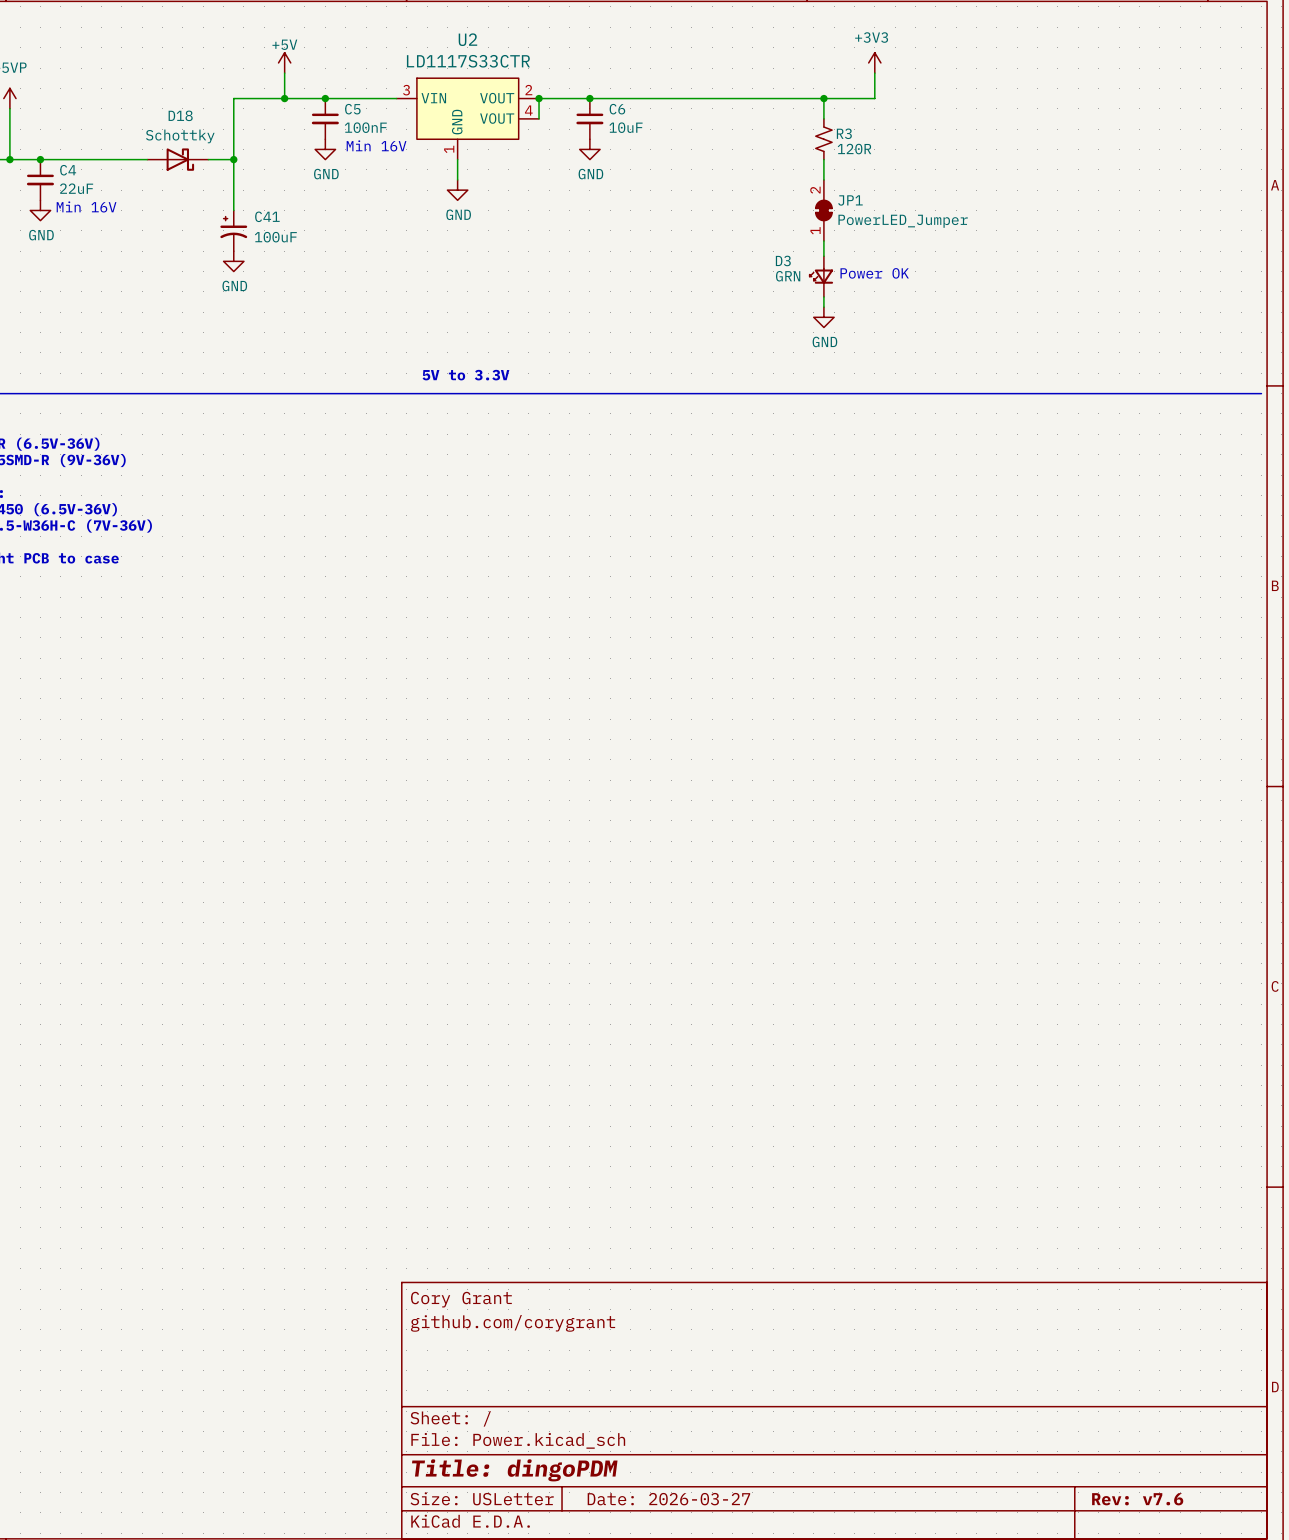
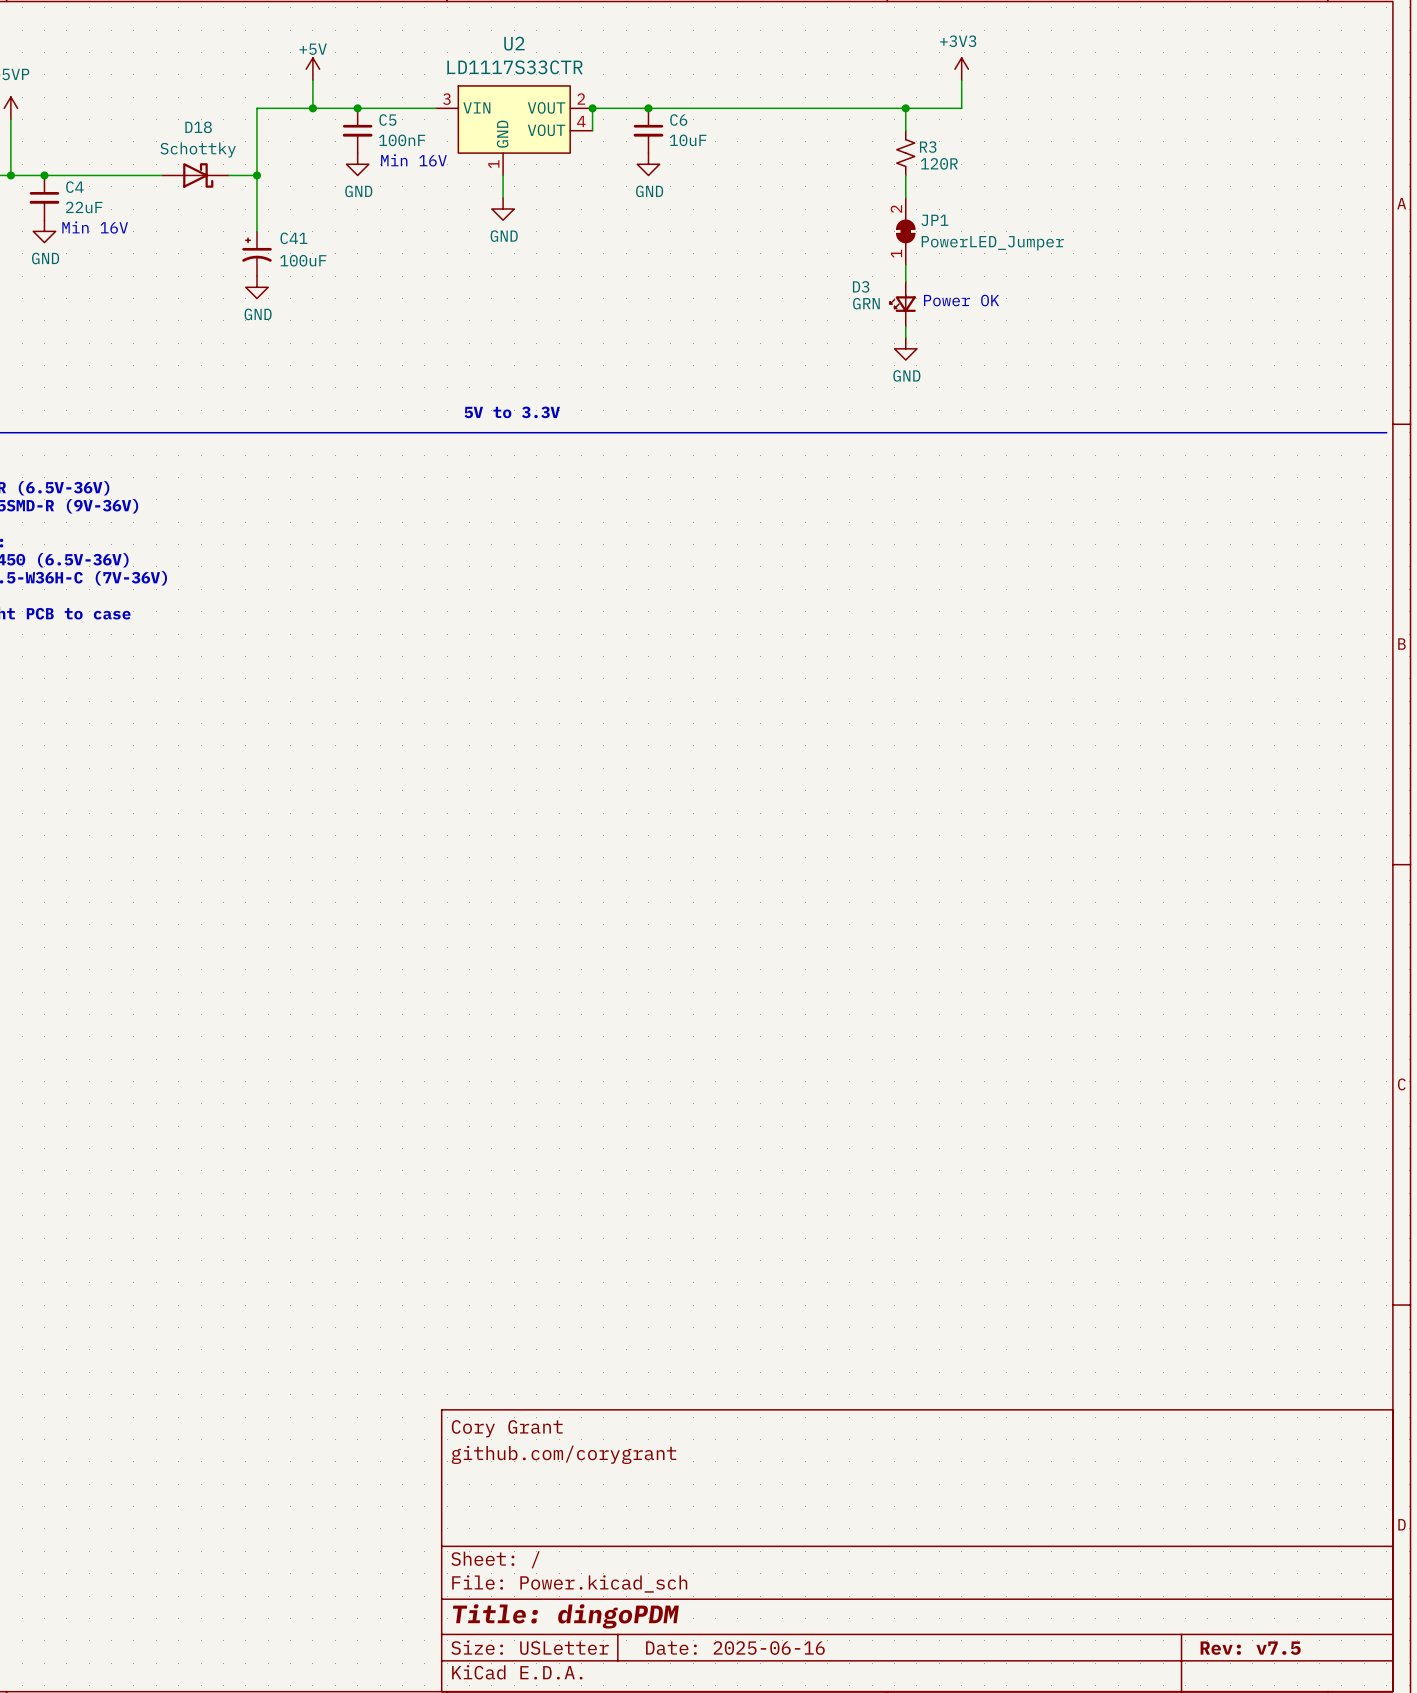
title block: Date: 2026-03-27 (668, 1499) -> Date: 2025-06-16 (735, 1648)
title block: Rev: v7.6 (1137, 1499) -> Rev: v7.5 (1250, 1648)

